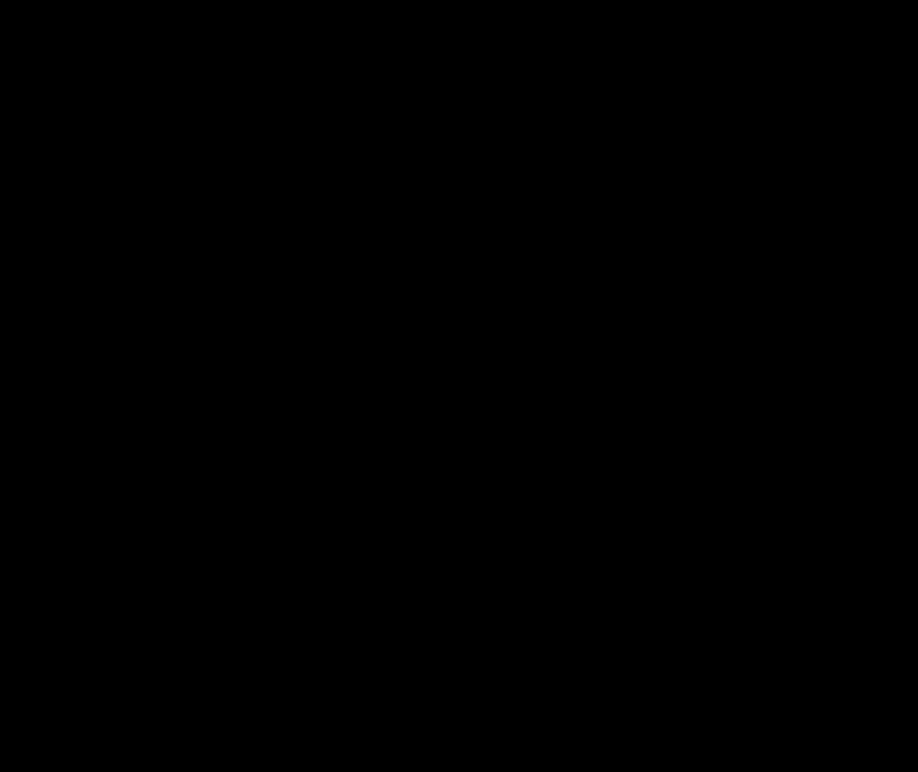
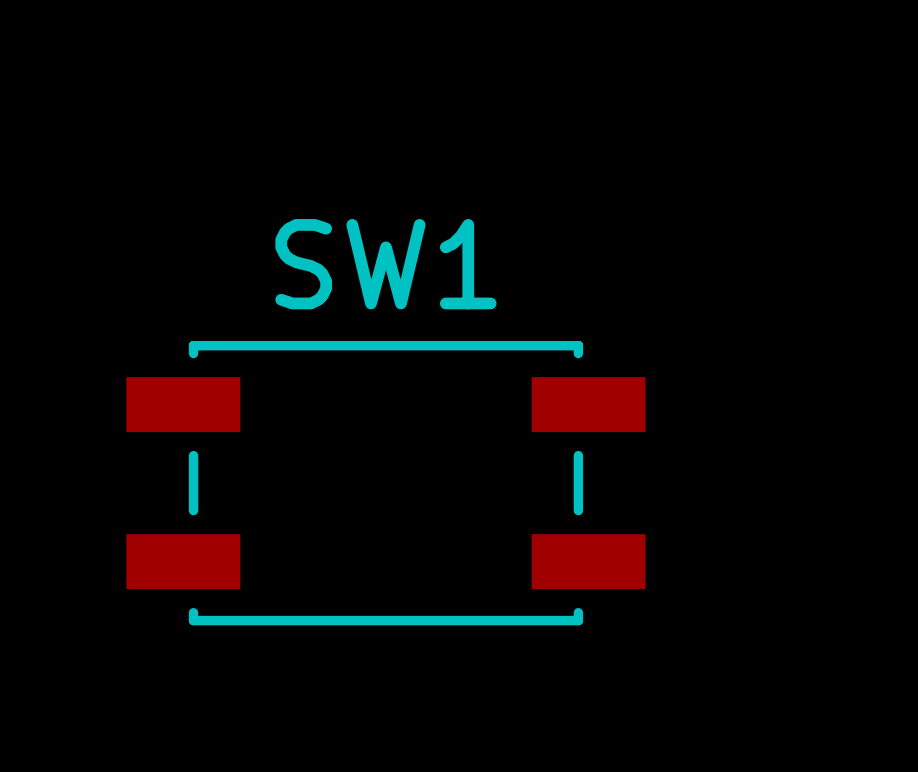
SW1: none -> (385, 483)

